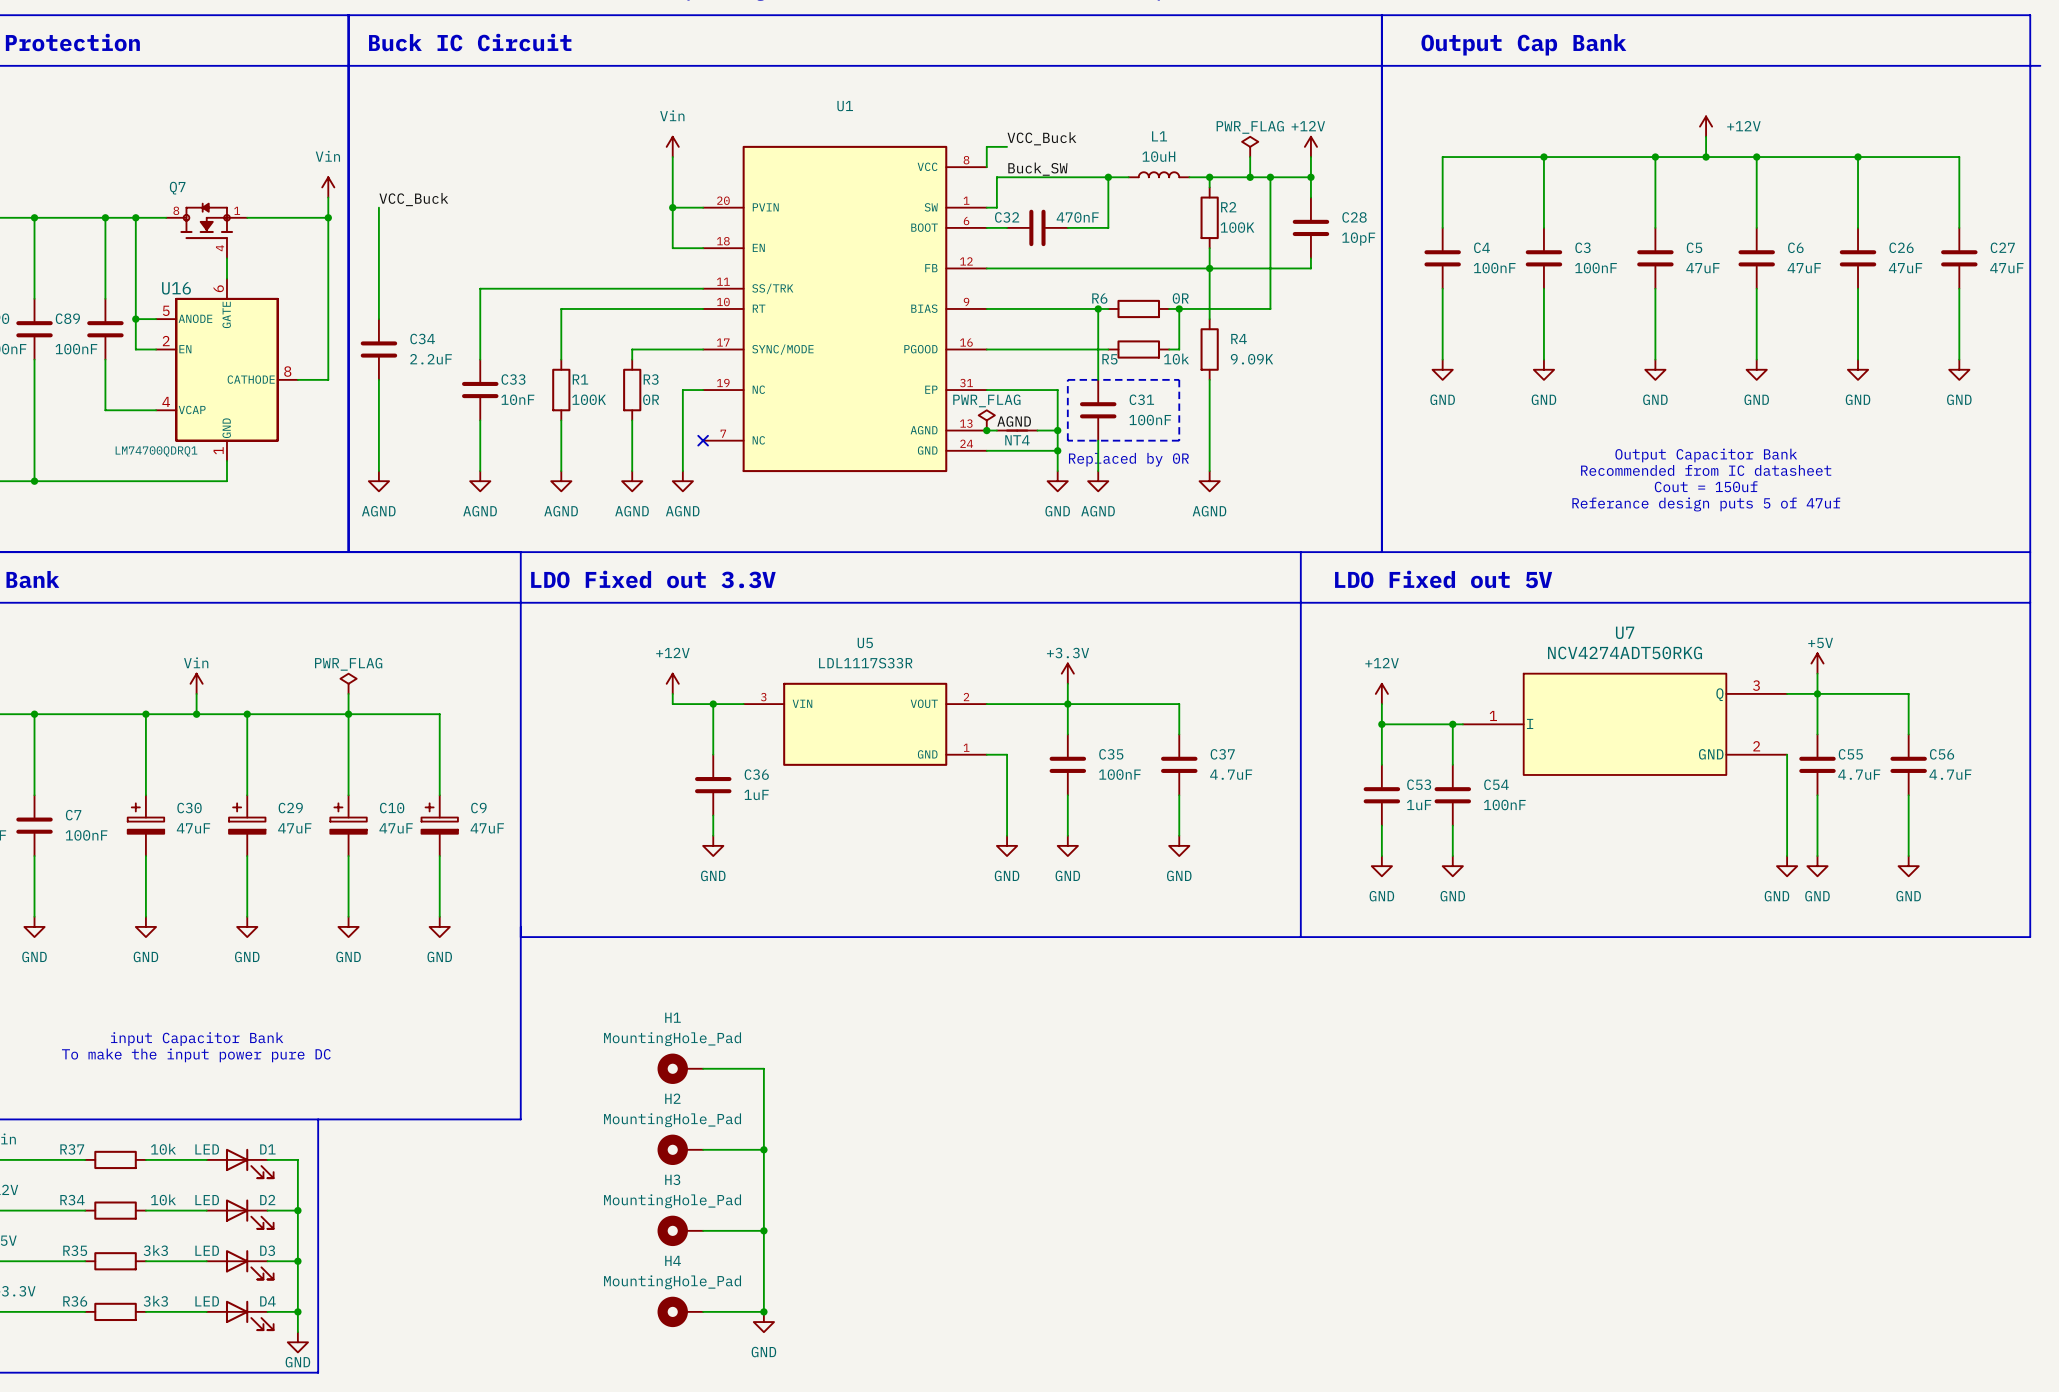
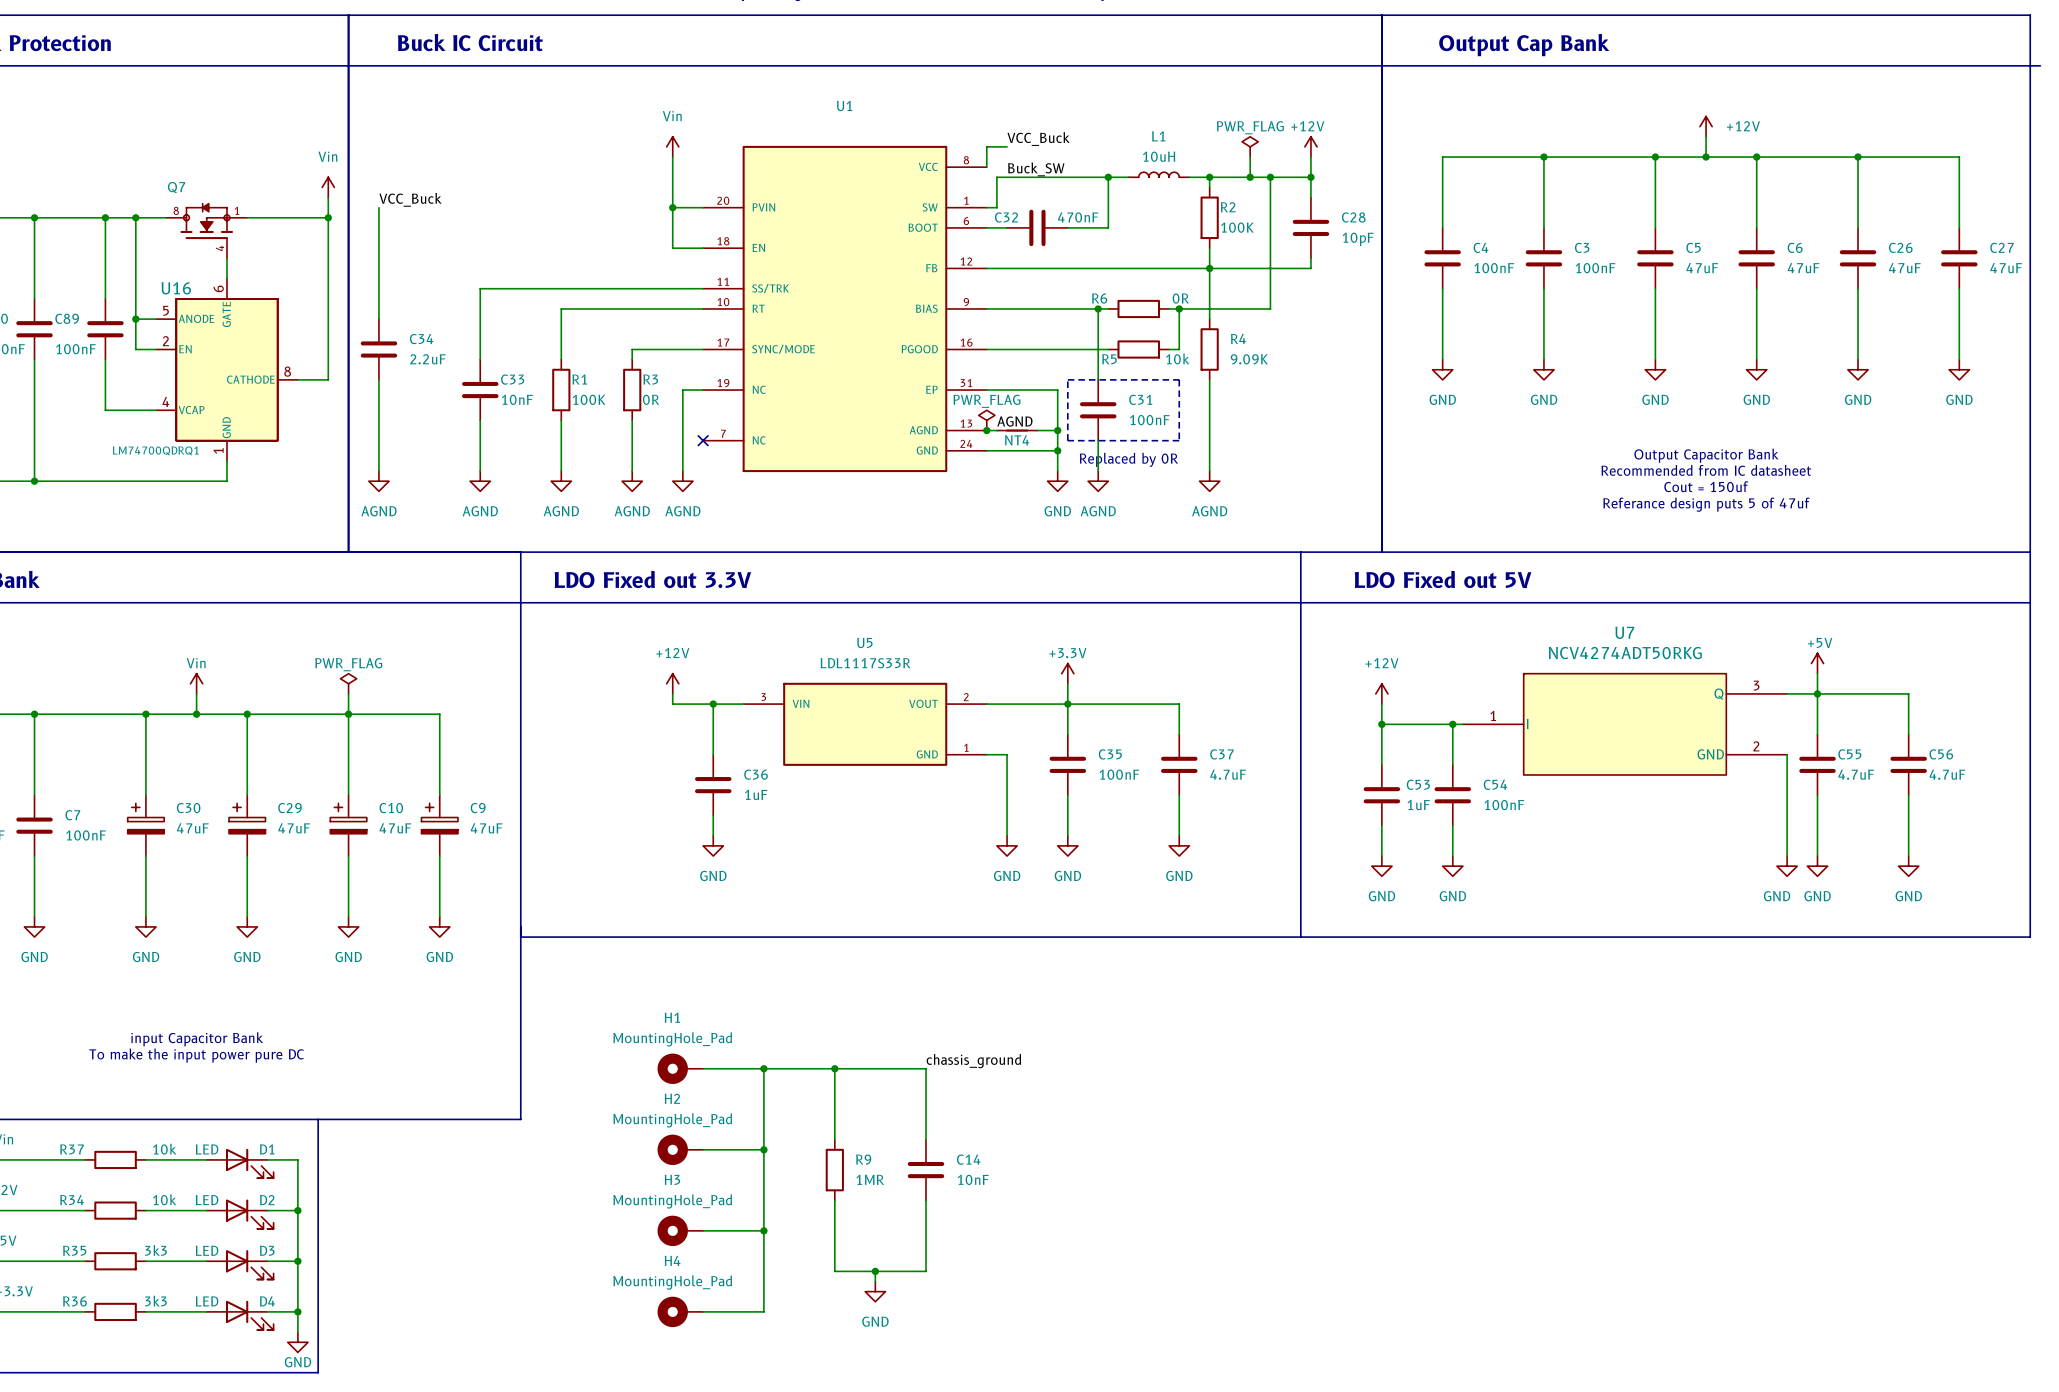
label: none -> chassis_ground (973, 1061)
wire: none -> (763, 1068) (926, 1068) (926, 1139)
junction: none -> (763, 1068)
wire: none -> (834, 1068) (834, 1139)
junction: none -> (834, 1068)
R9: none -> 1MR (834, 1170)
C14: none -> 10nF (926, 1170)
wire: none -> (834, 1200) (834, 1271) (926, 1271) (926, 1200)
wire: none -> (875, 1271) (875, 1281)
junction: none -> (875, 1271)
junction: (763, 1311) -> none
power symbol position: GND (763, 1322) -> GND (875, 1291)

